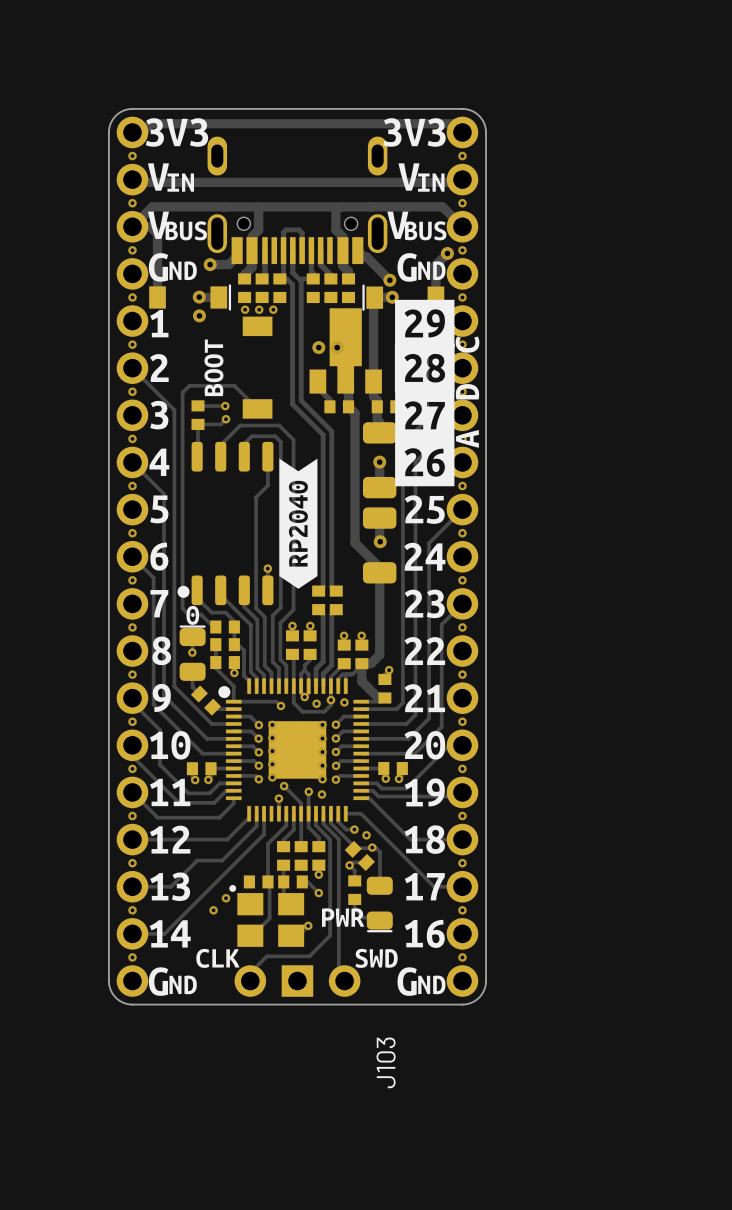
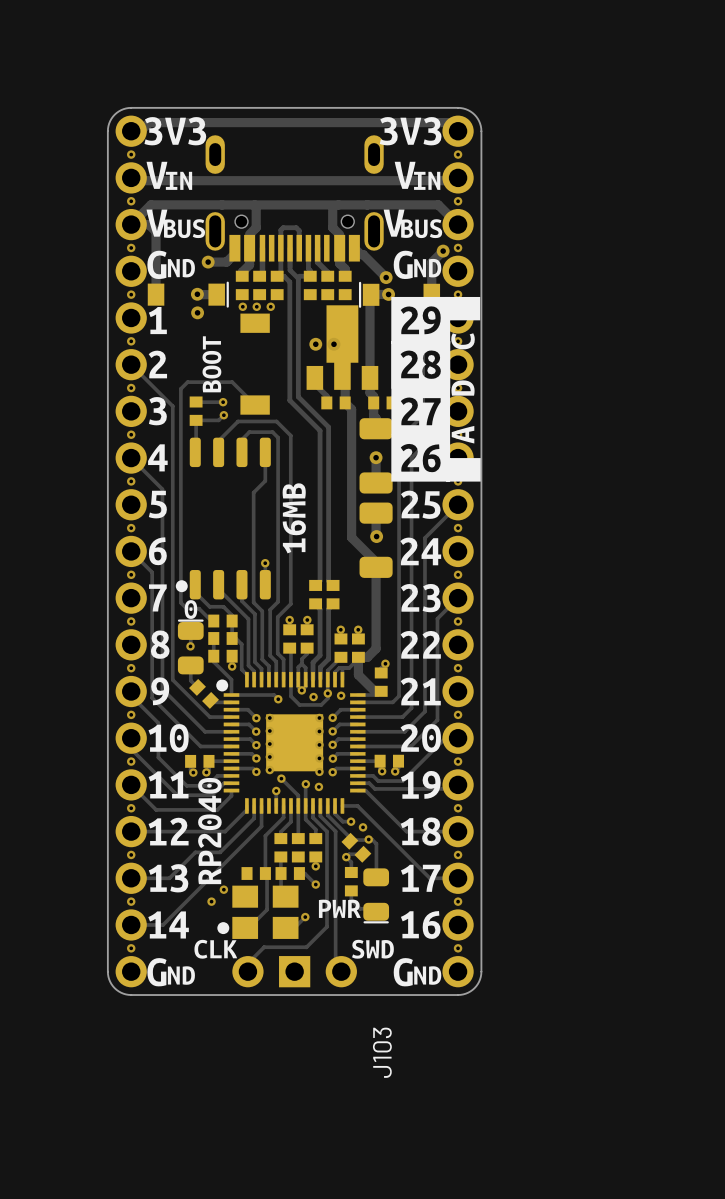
drawing: none -> [445, 296, 481, 321]
drawing: none -> [446, 458, 482, 482]
drawing: none -> [282, 483, 306, 554]
part: (298, 523) -> none
drawing: none -> [198, 777, 222, 885]
part footprint: [229, 884, 305, 947] -> [232, 885, 299, 939]
drawing: none -> [217, 922, 230, 935]

